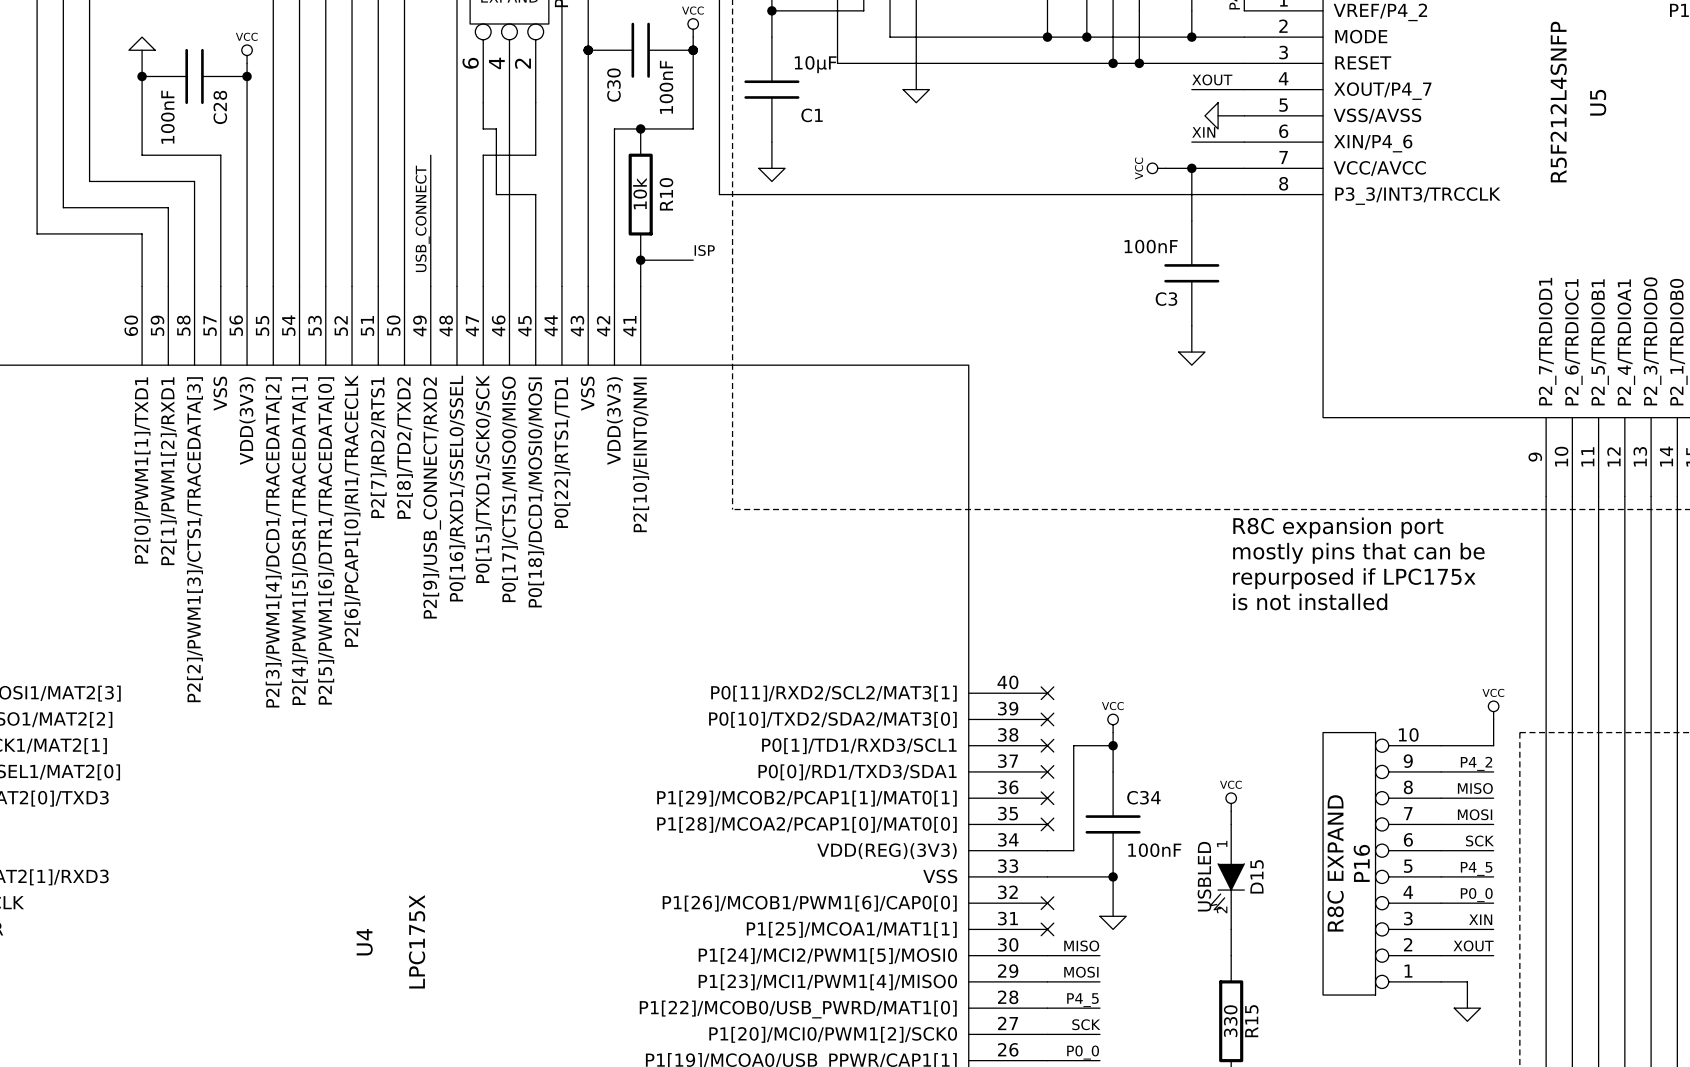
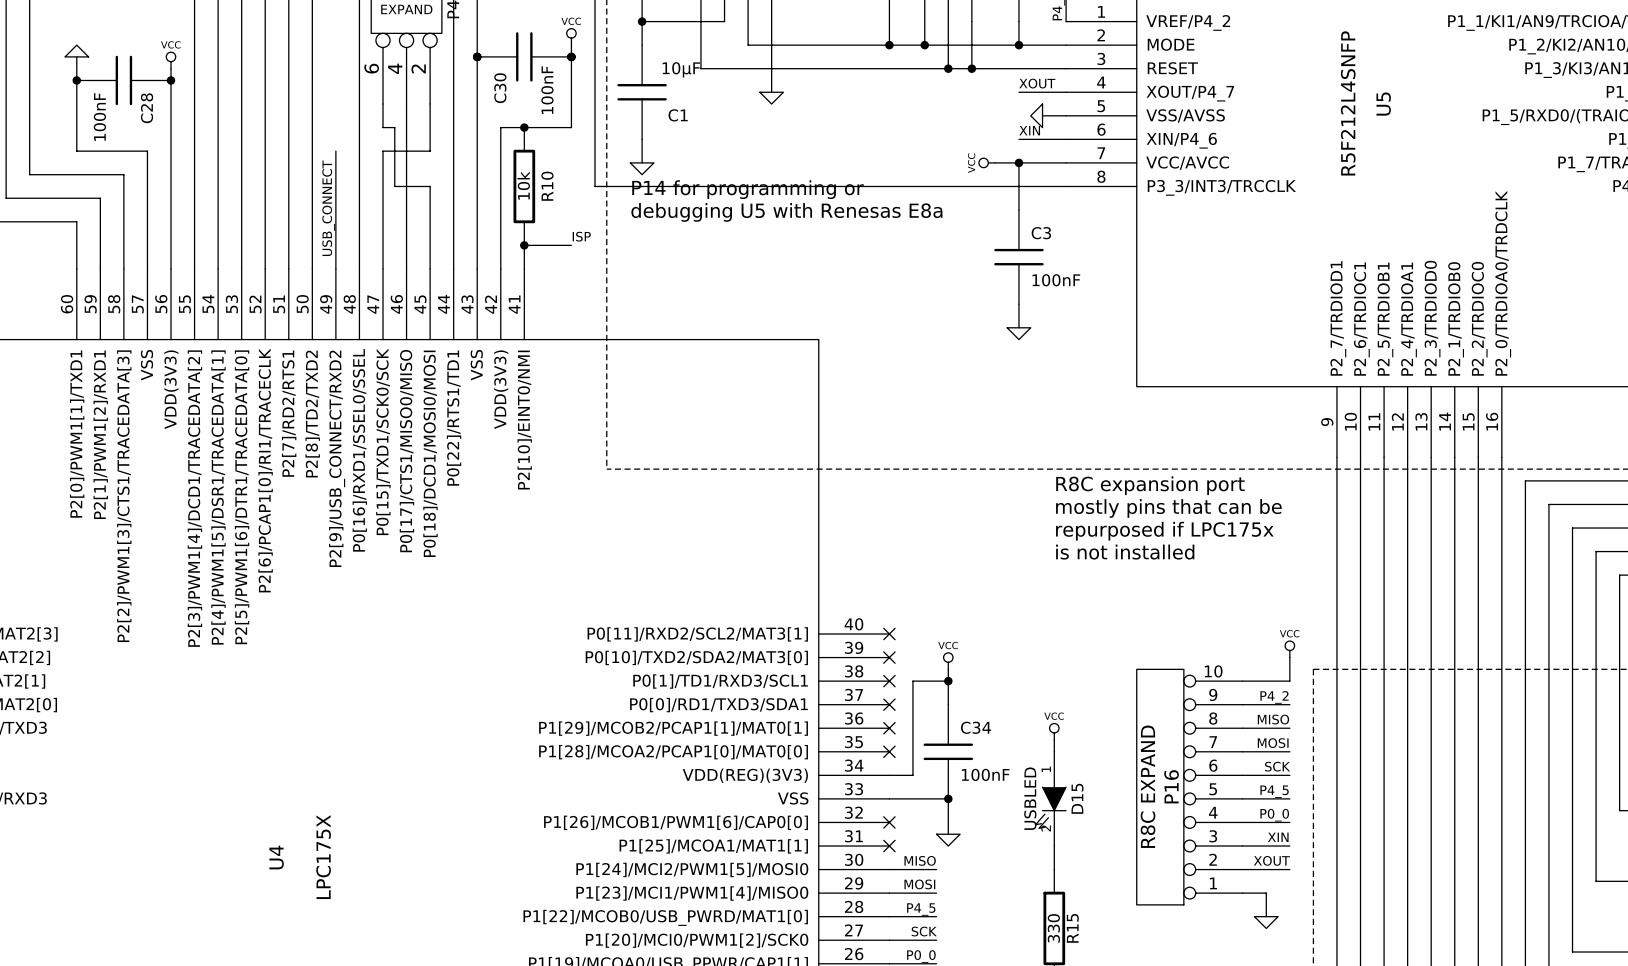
text: none -> P14 for programming or (747, 189)
text: none -> debugging U5 with Renesas E8a (786, 212)
C3 value position: 100nF (1151, 246) -> 100nF (1056, 280)
C3 name position: C3 (1166, 299) -> C3 (1041, 233)

